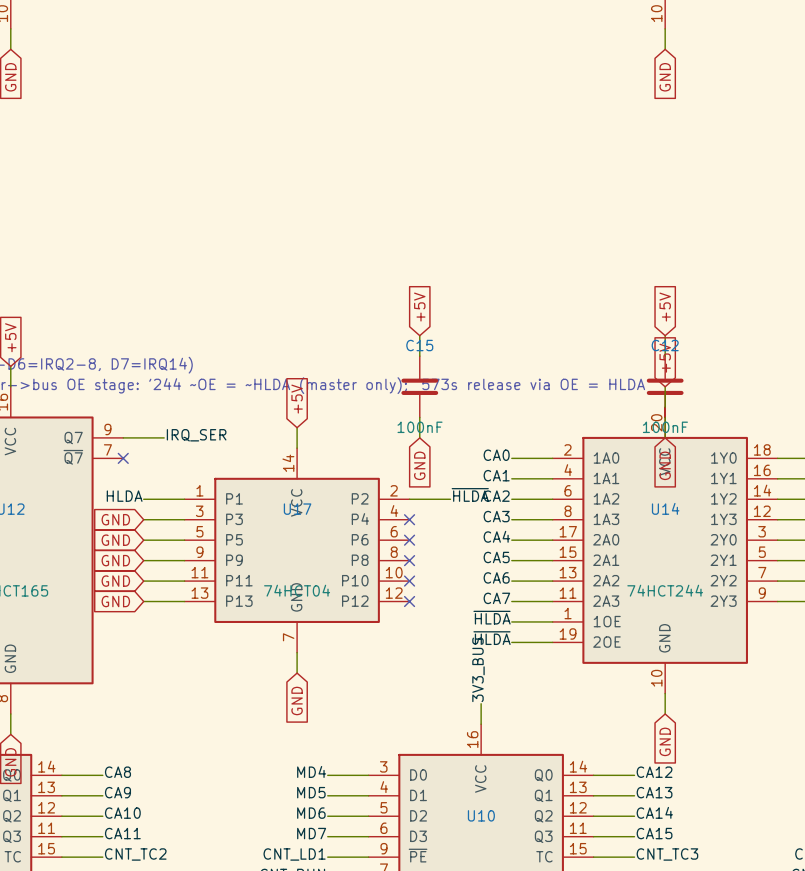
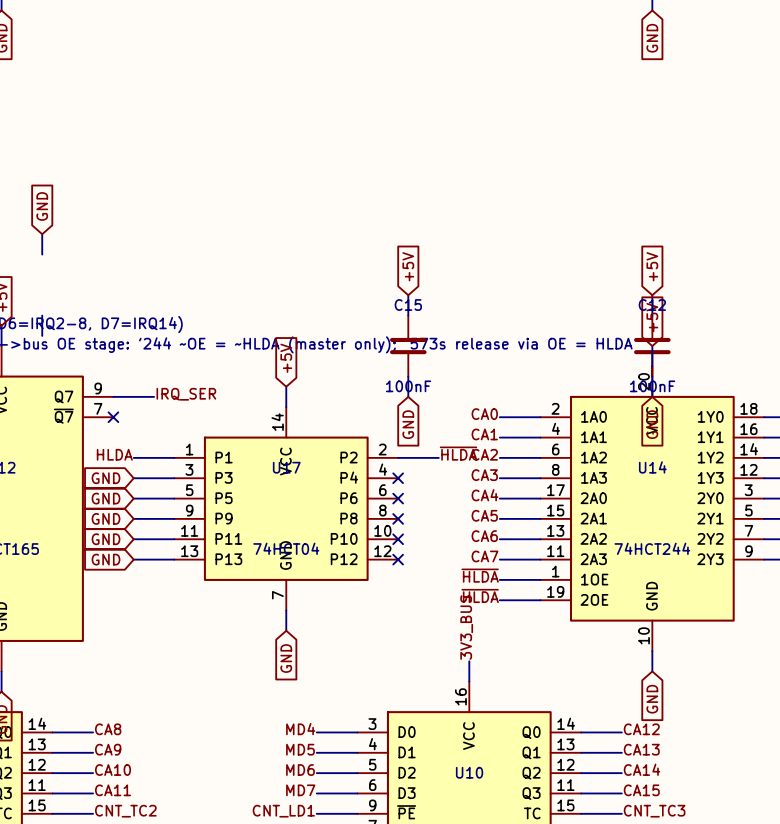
global label: none -> GND (42, 206)
wire: none -> (42, 234) (42, 254)
wire: none -> (42, 315) (42, 335)

